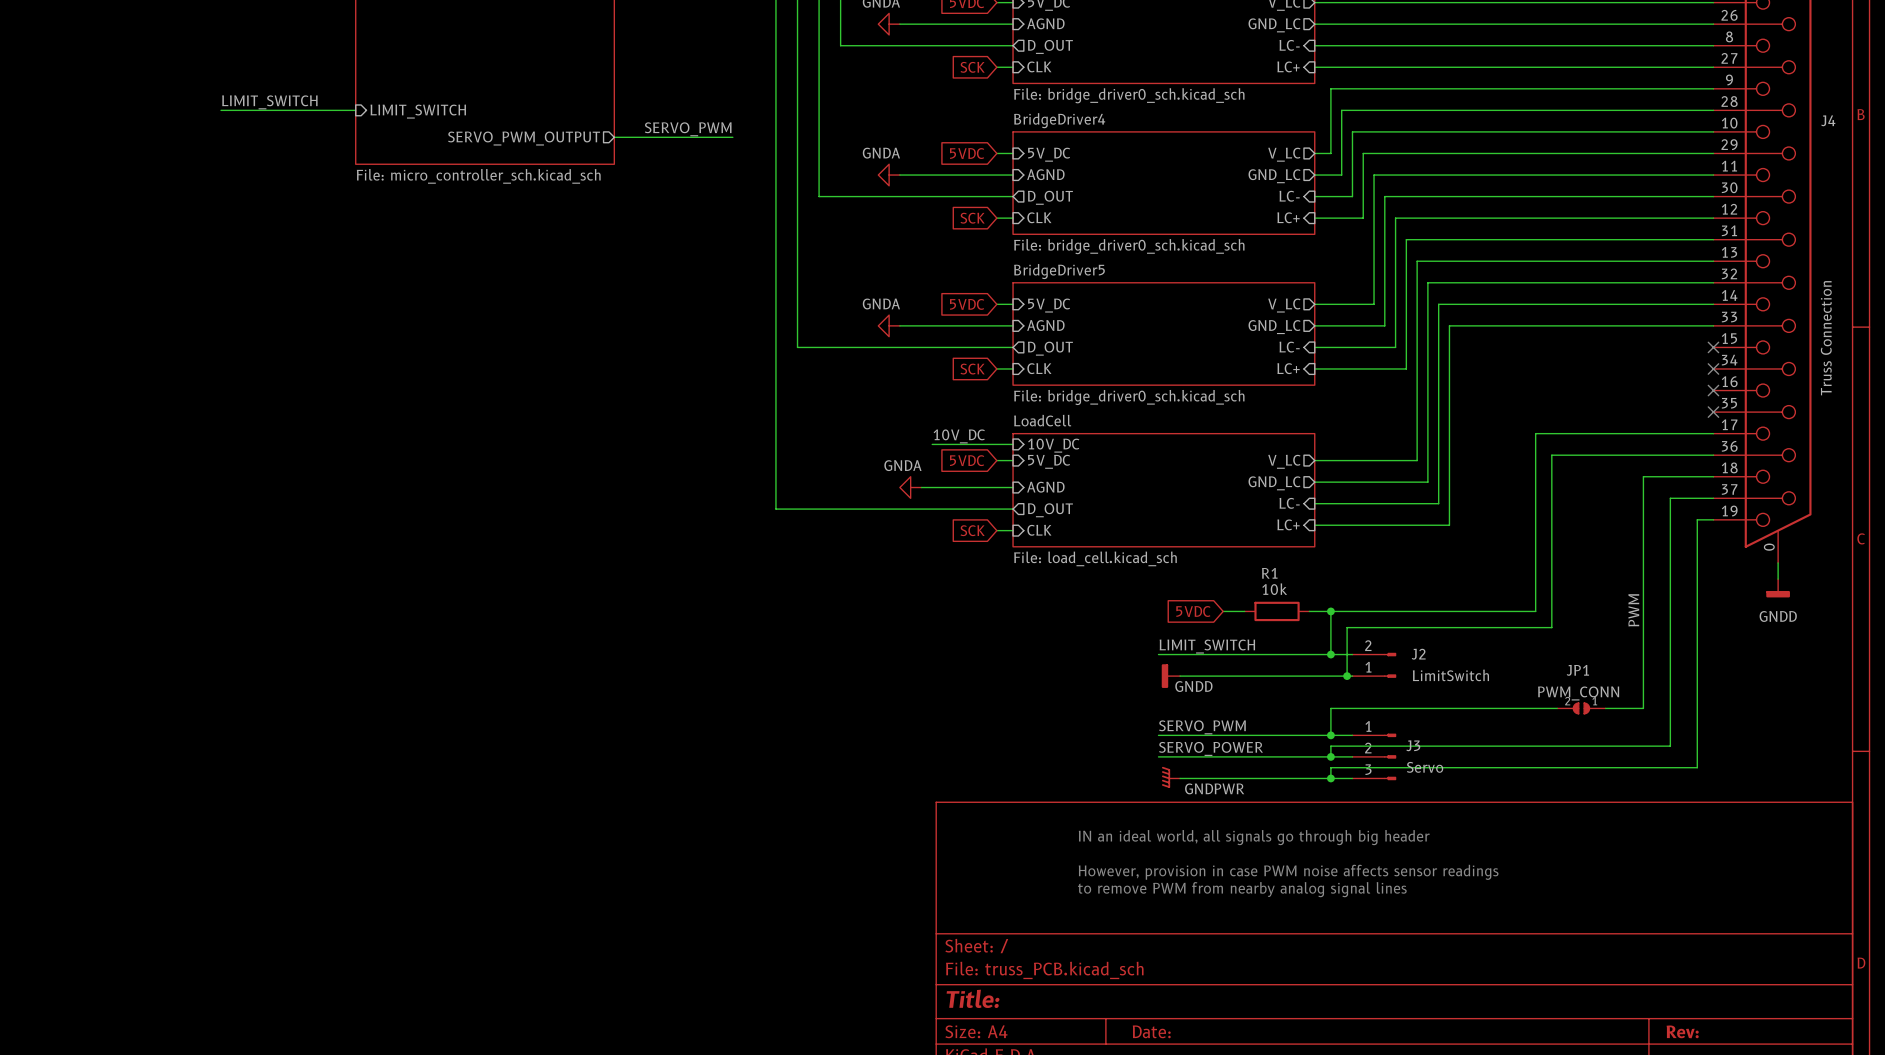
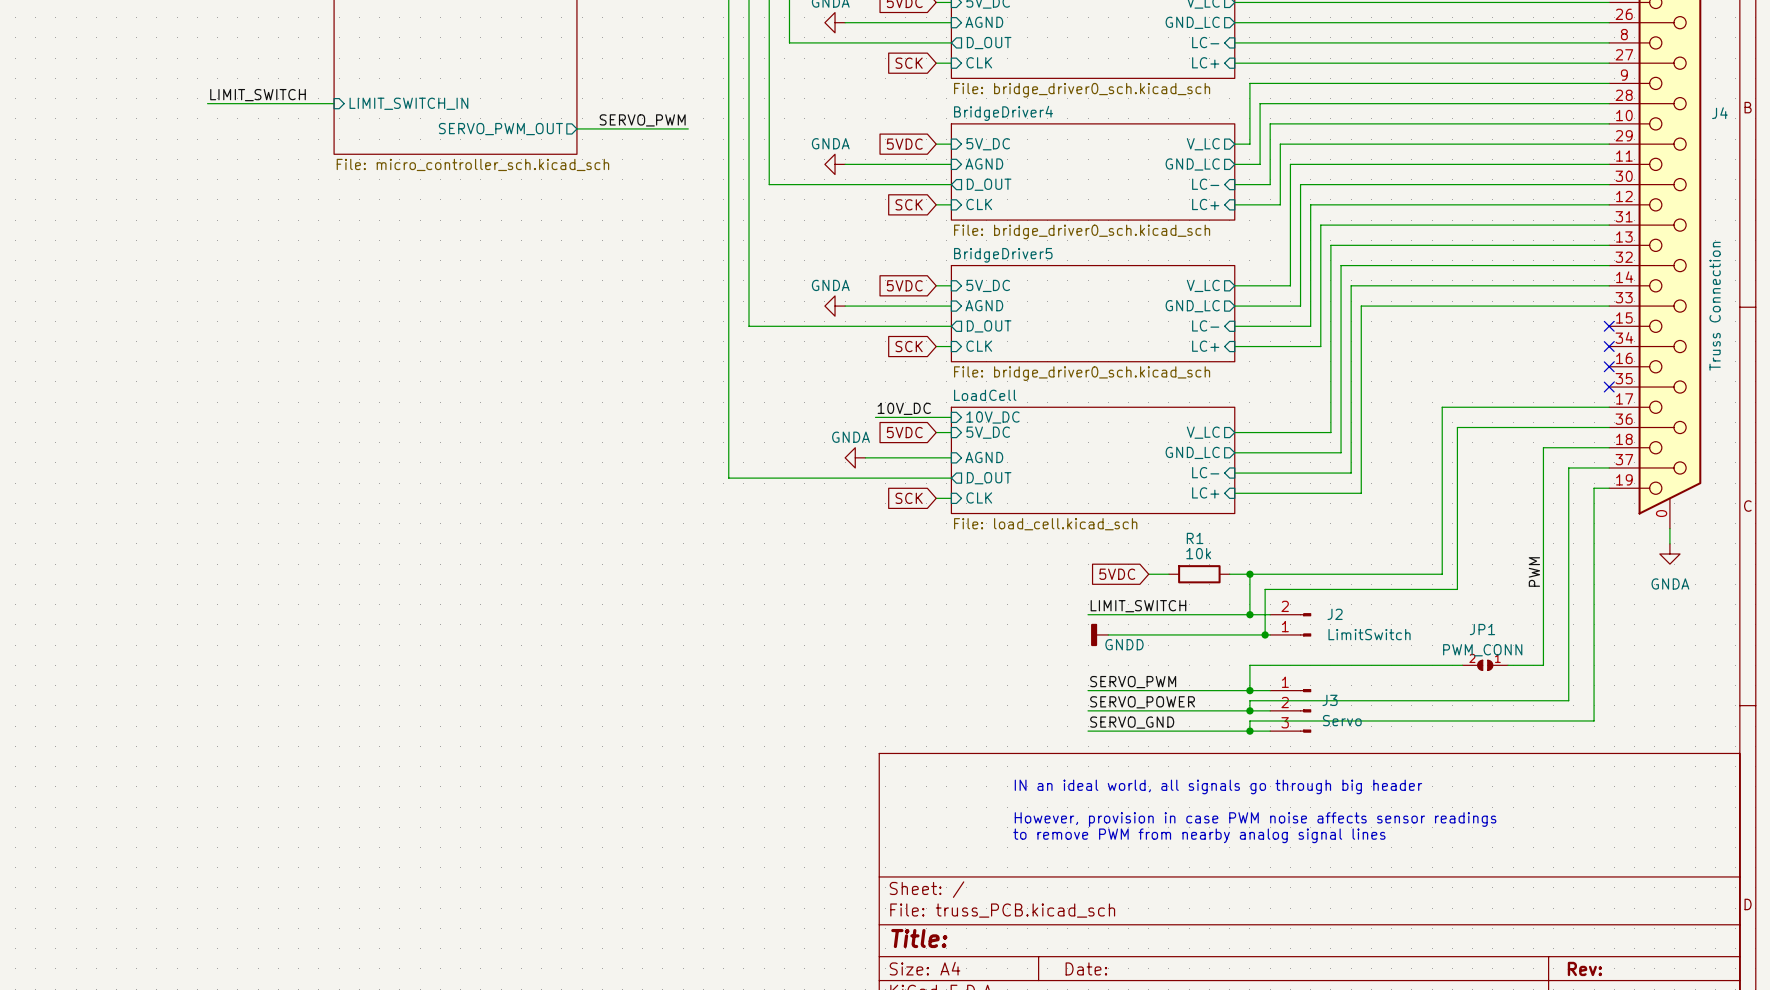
sheet pin: LIMIT_SWITCH (418, 111) -> LIMIT_SWITCH_IN (408, 103)
sheet pin: SERVO_PWM_OUTPUT (524, 138) -> SERVO_PWM_OUT (500, 129)
power symbol: GNDD (1778, 588) -> GNDA (1669, 554)
label: none -> SERVO_GND (1132, 722)
power symbol: GNDPWR (1171, 777) -> none

